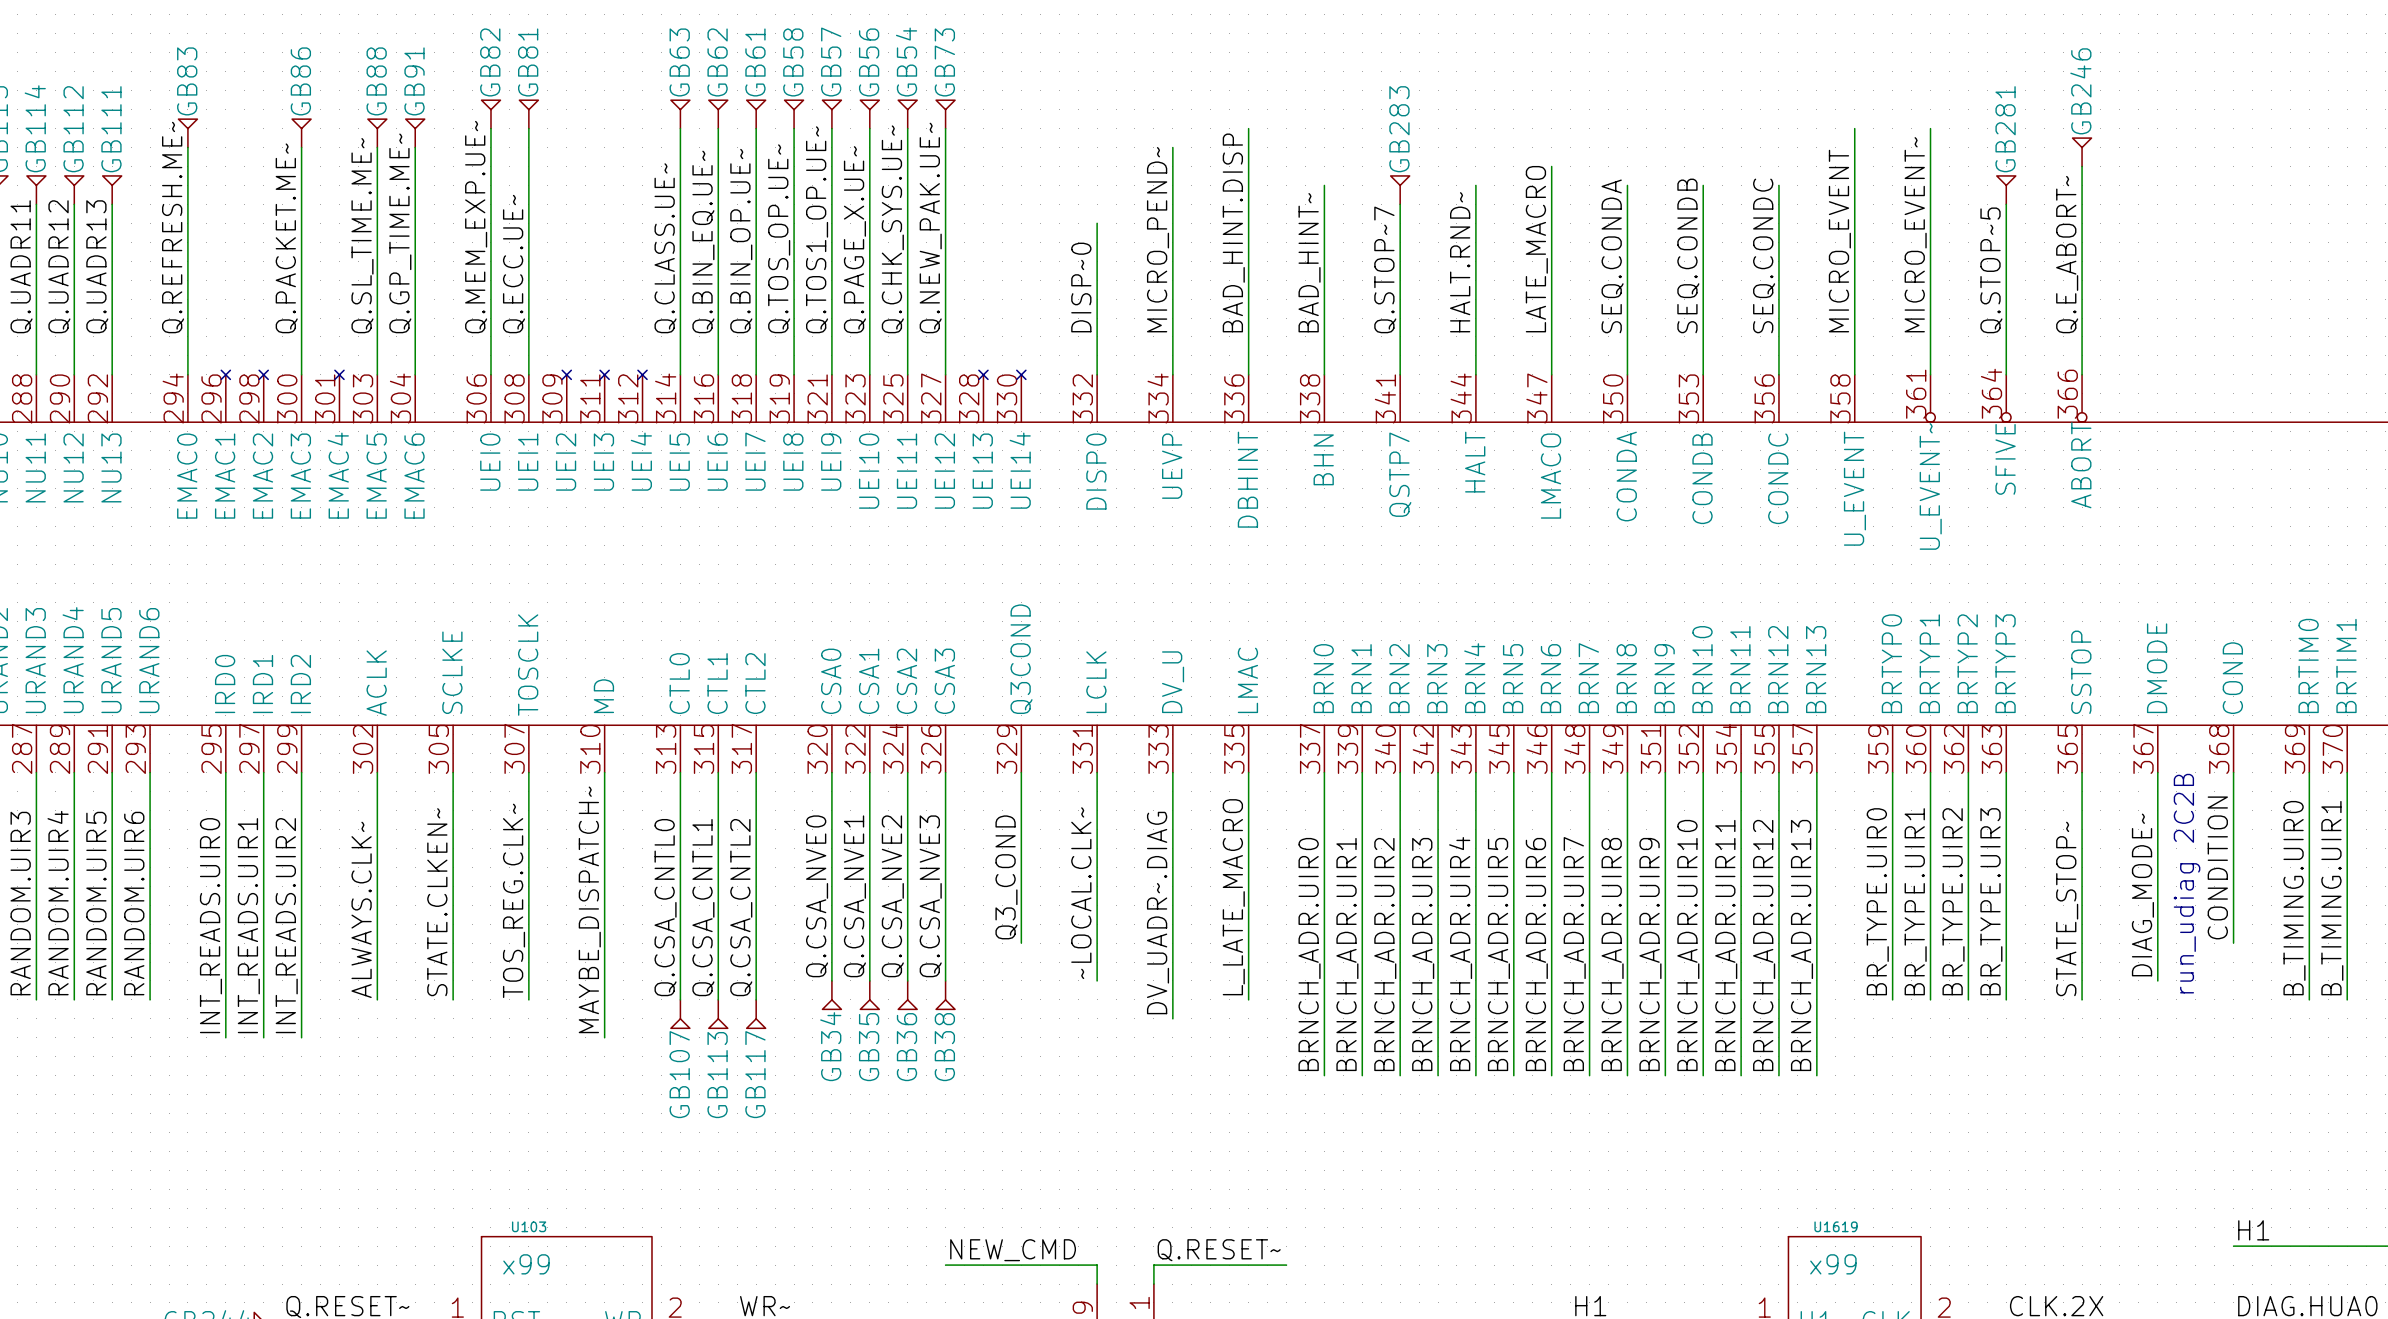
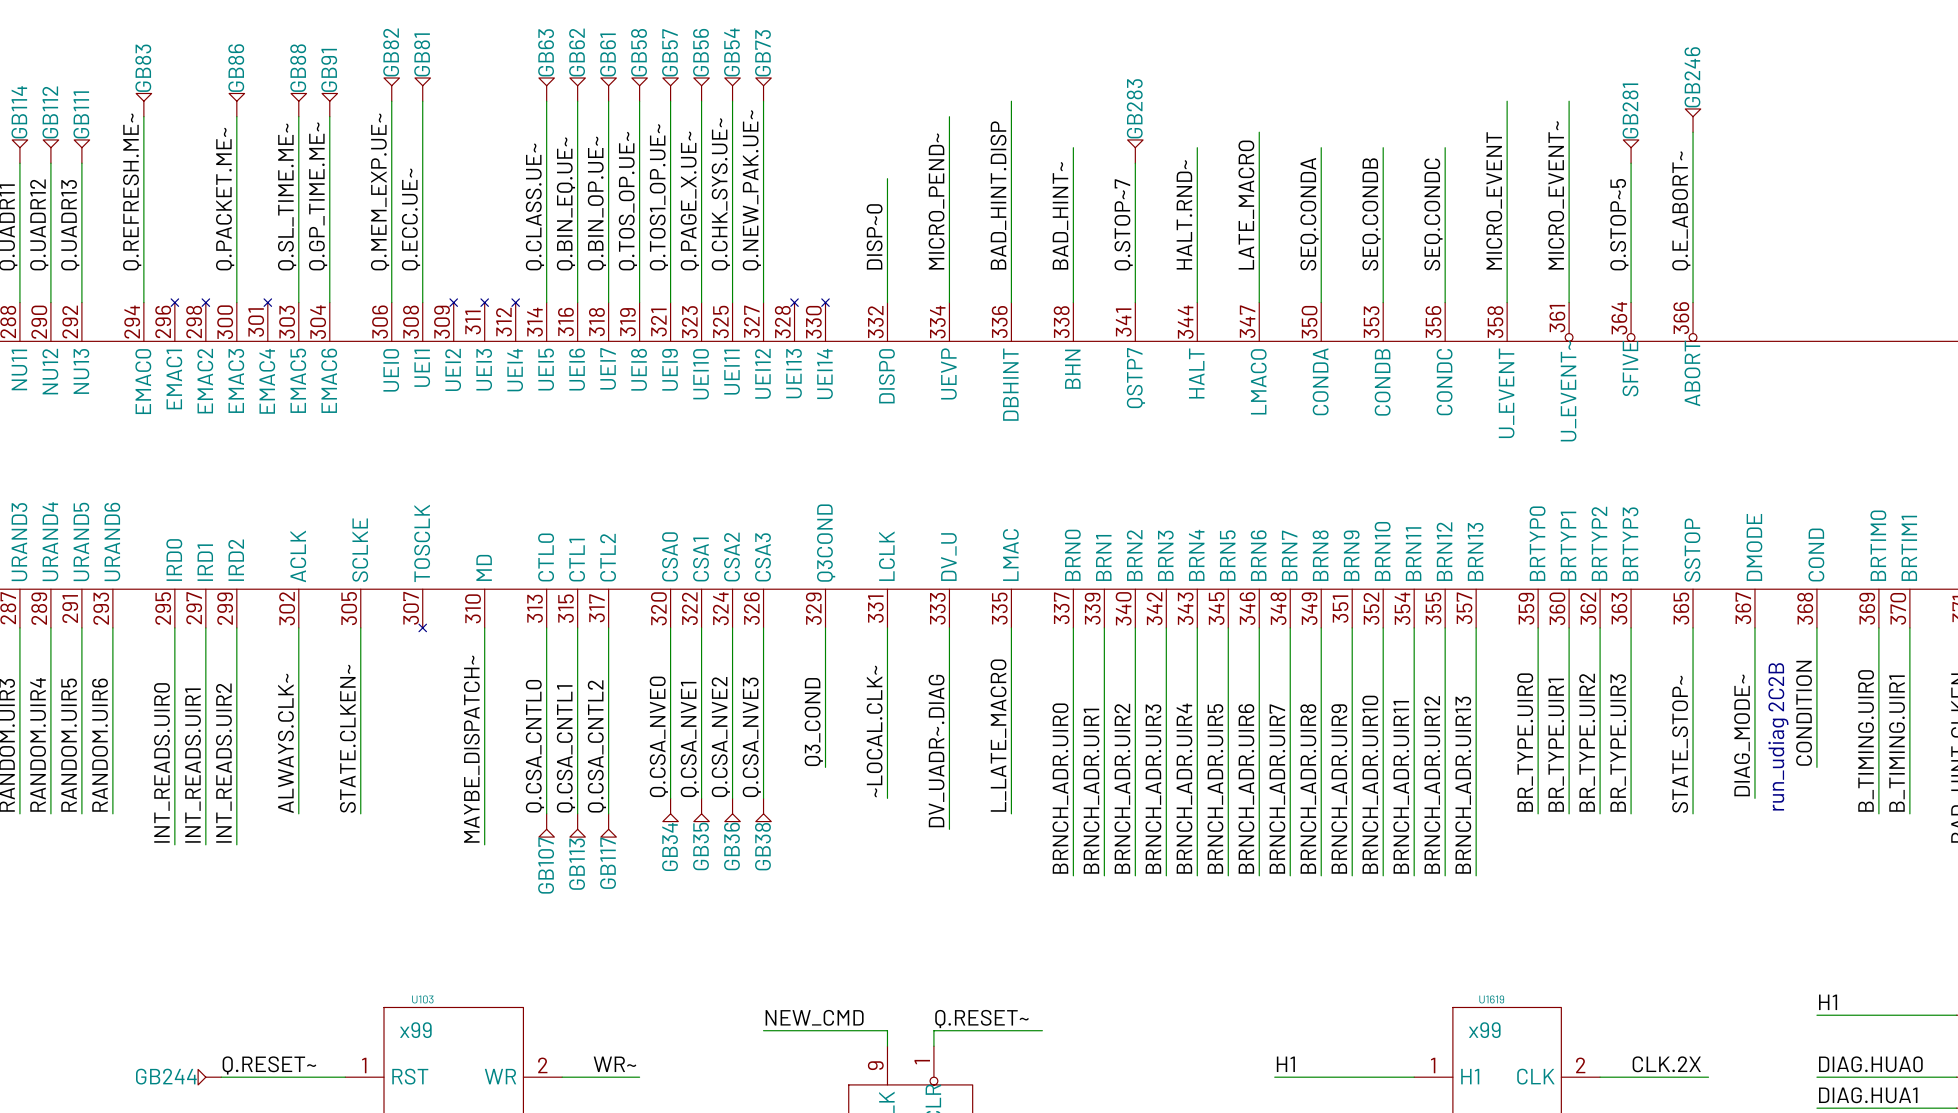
wire: (528, 772) (528, 999) -> none
no-connect mark: none -> (422, 627)
label: TOS_REG.CLK~ (514, 900) -> none

